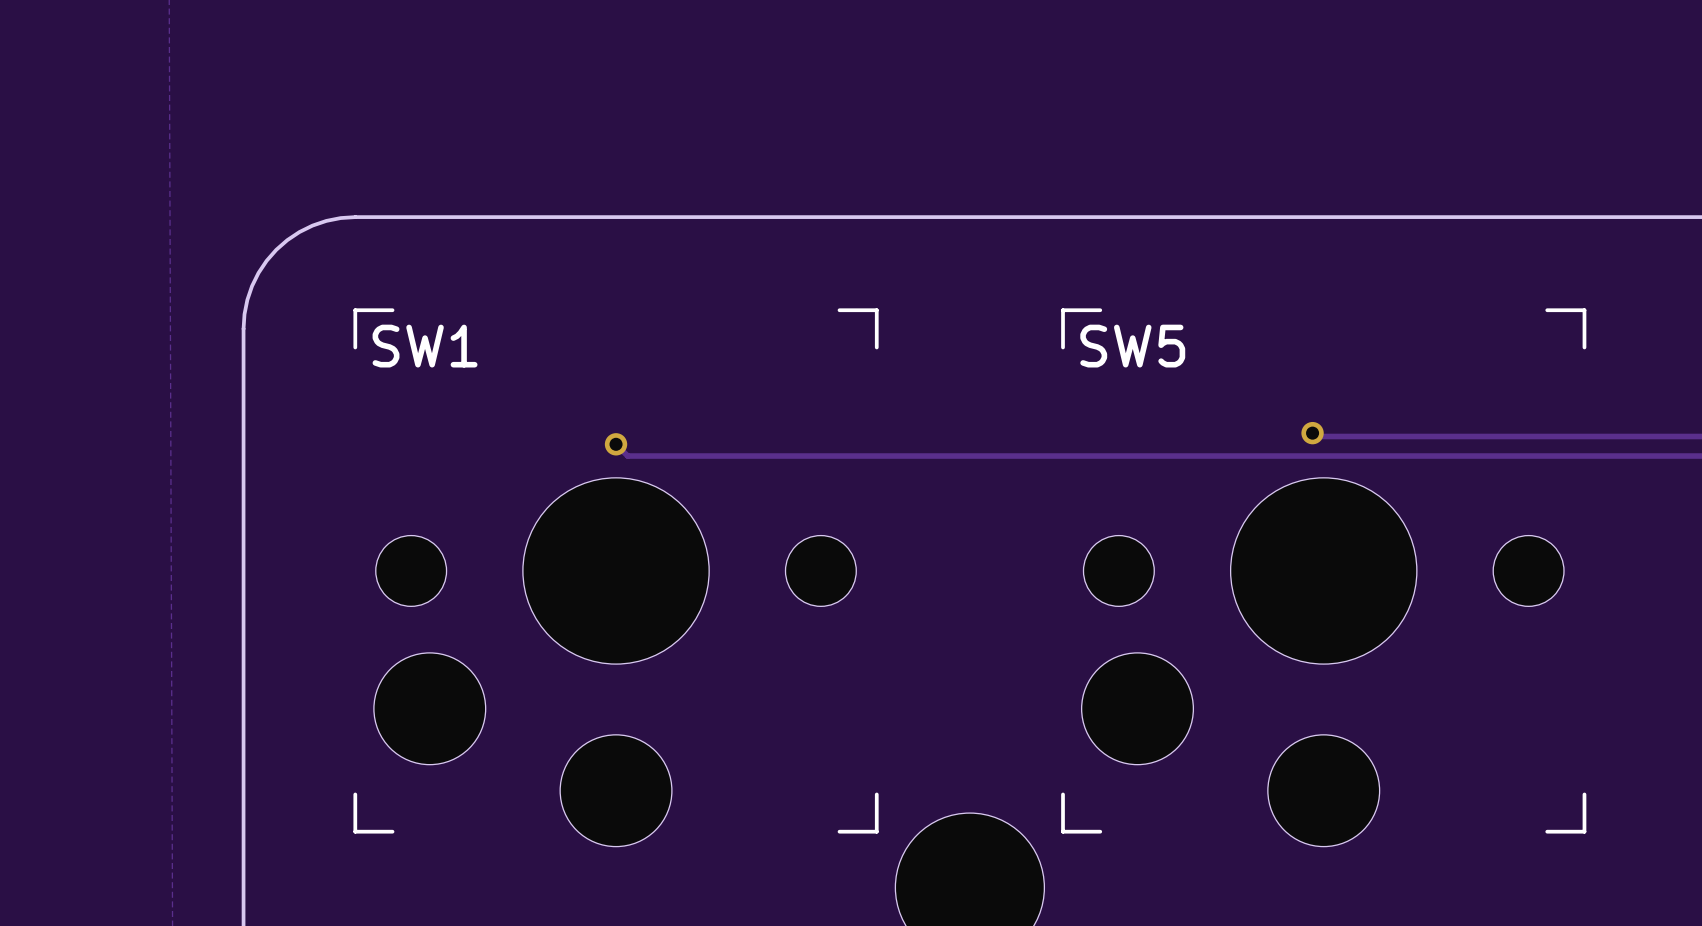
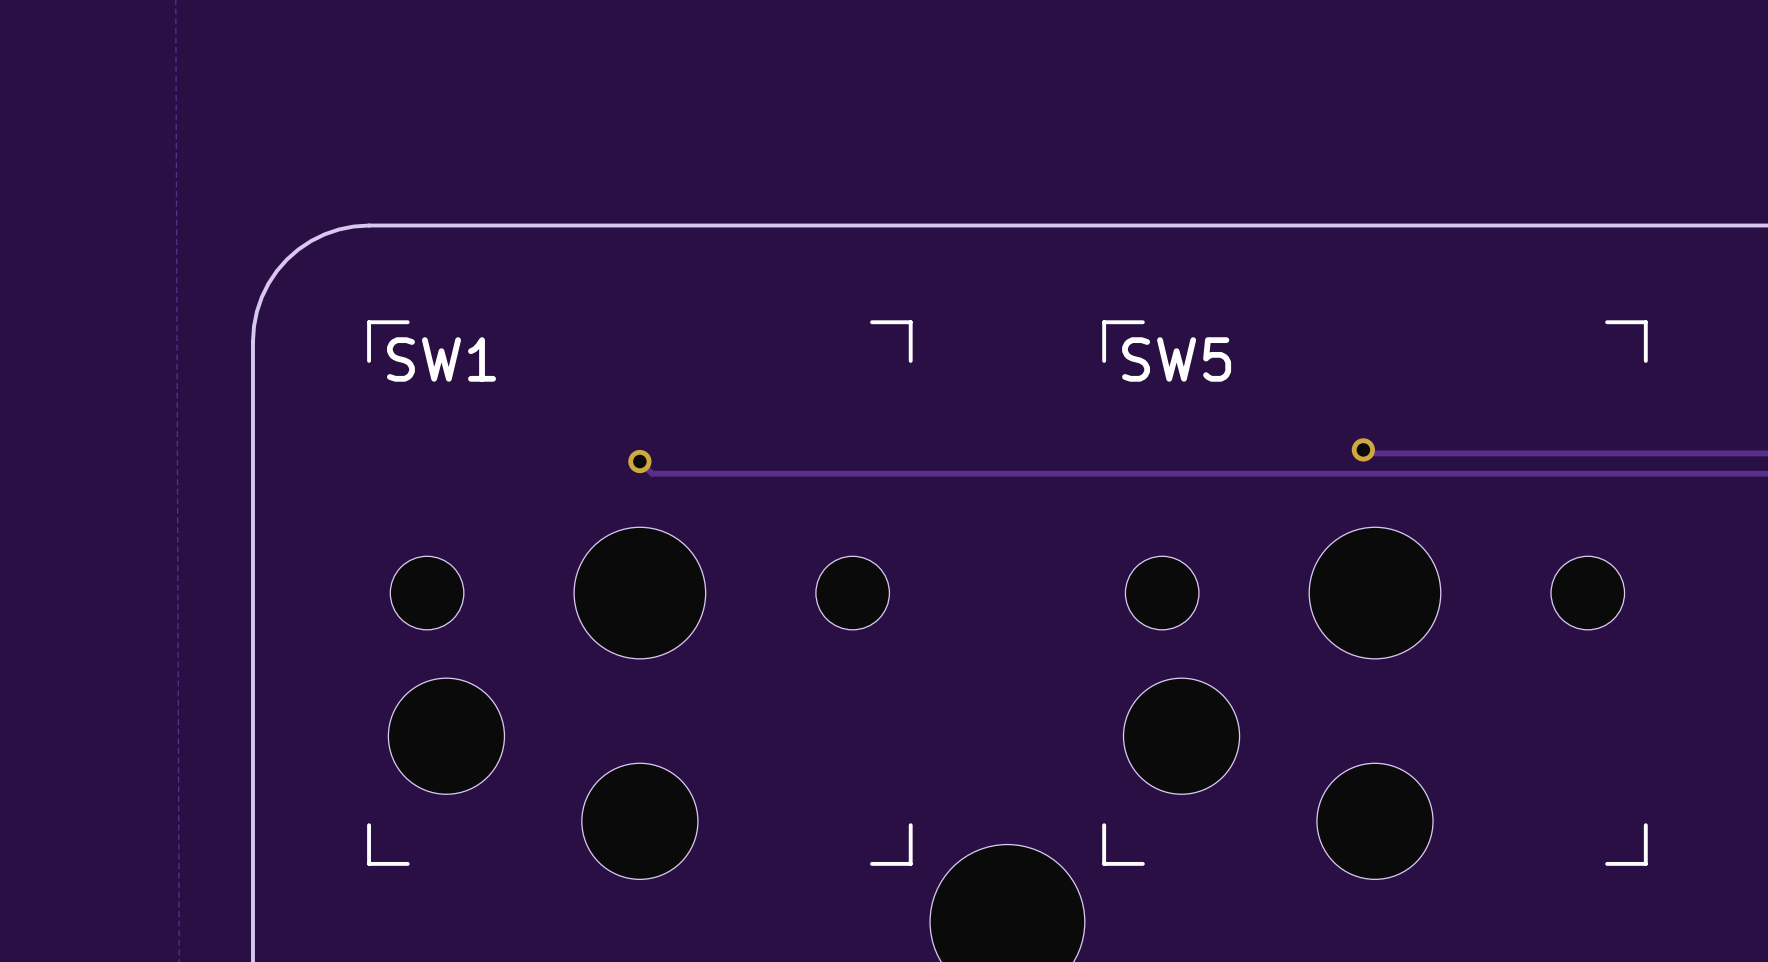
SW1 footprint: [353, 308, 879, 847] -> [367, 320, 913, 880]
SW5 footprint: [1061, 308, 1587, 847] -> [1102, 320, 1648, 880]

